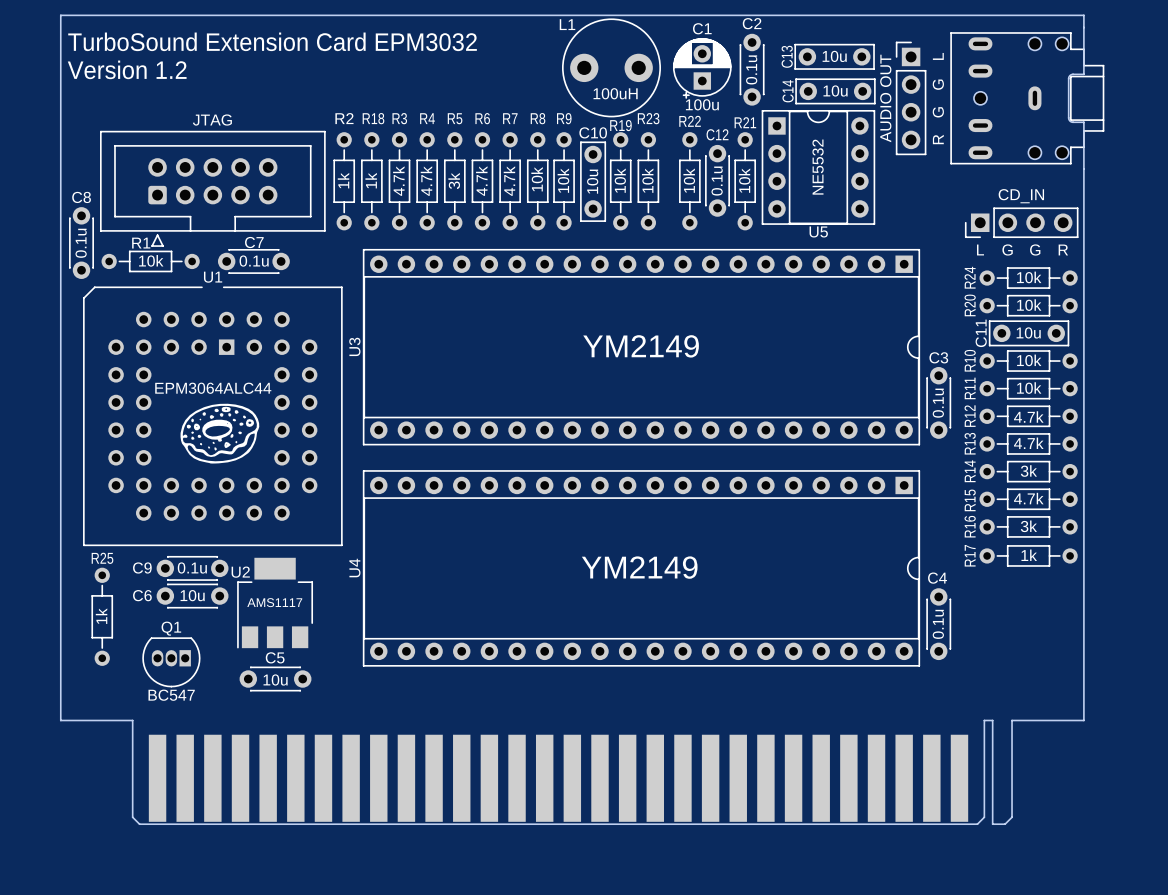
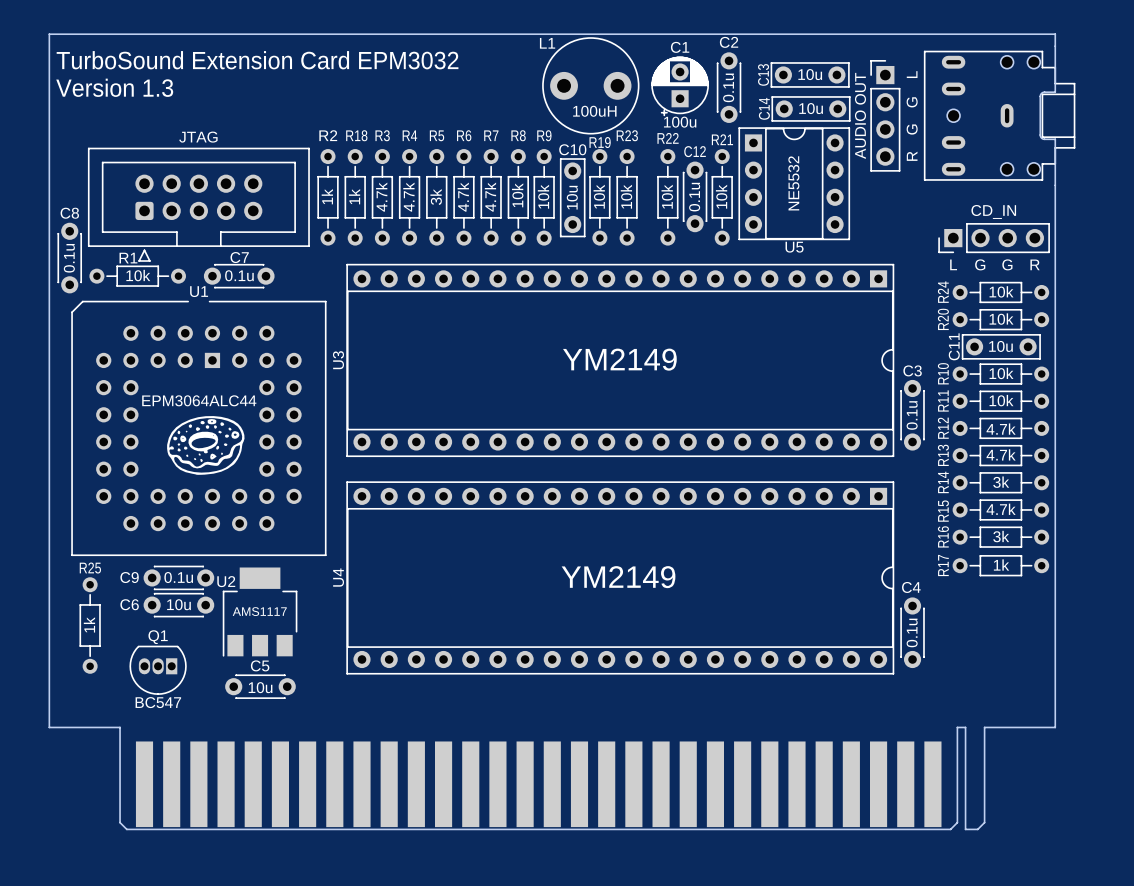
text: Version 1.2 (127, 69) -> Version 1.3 (114, 87)

